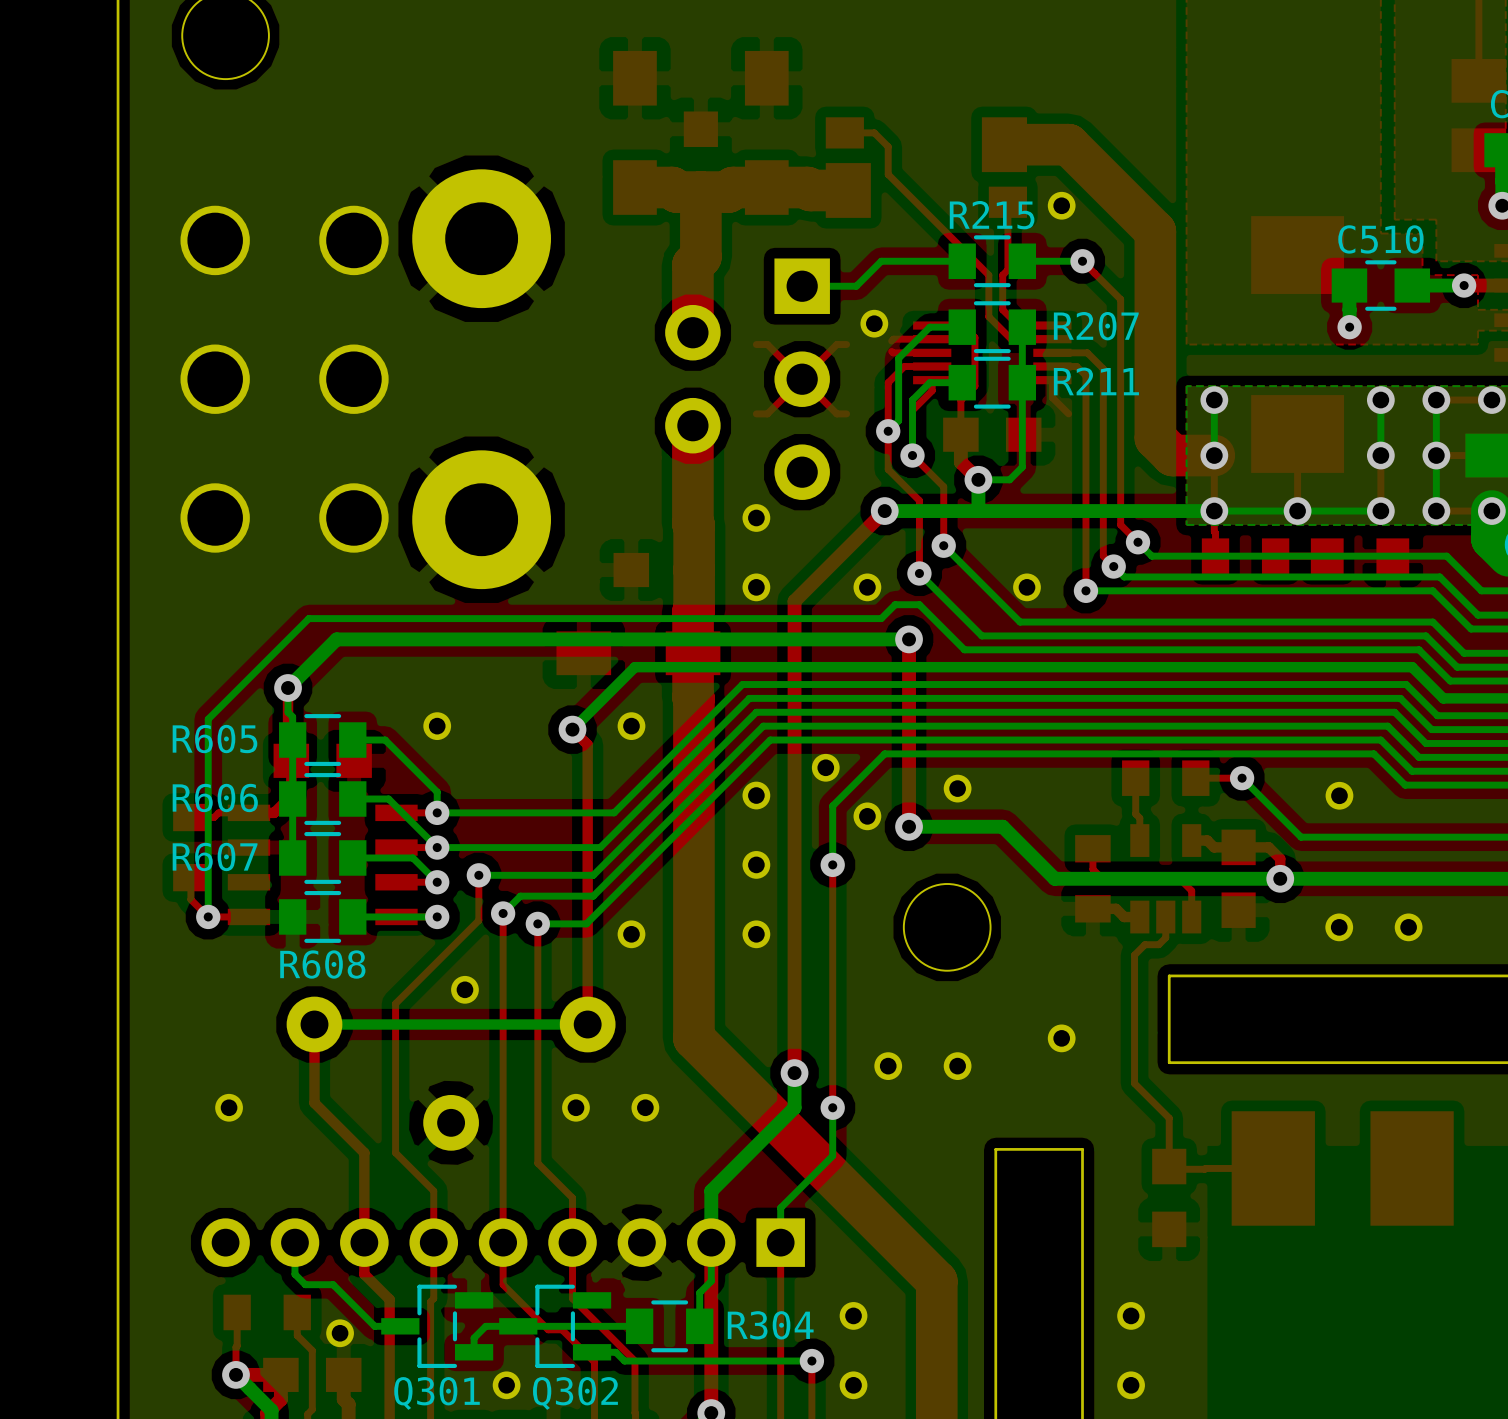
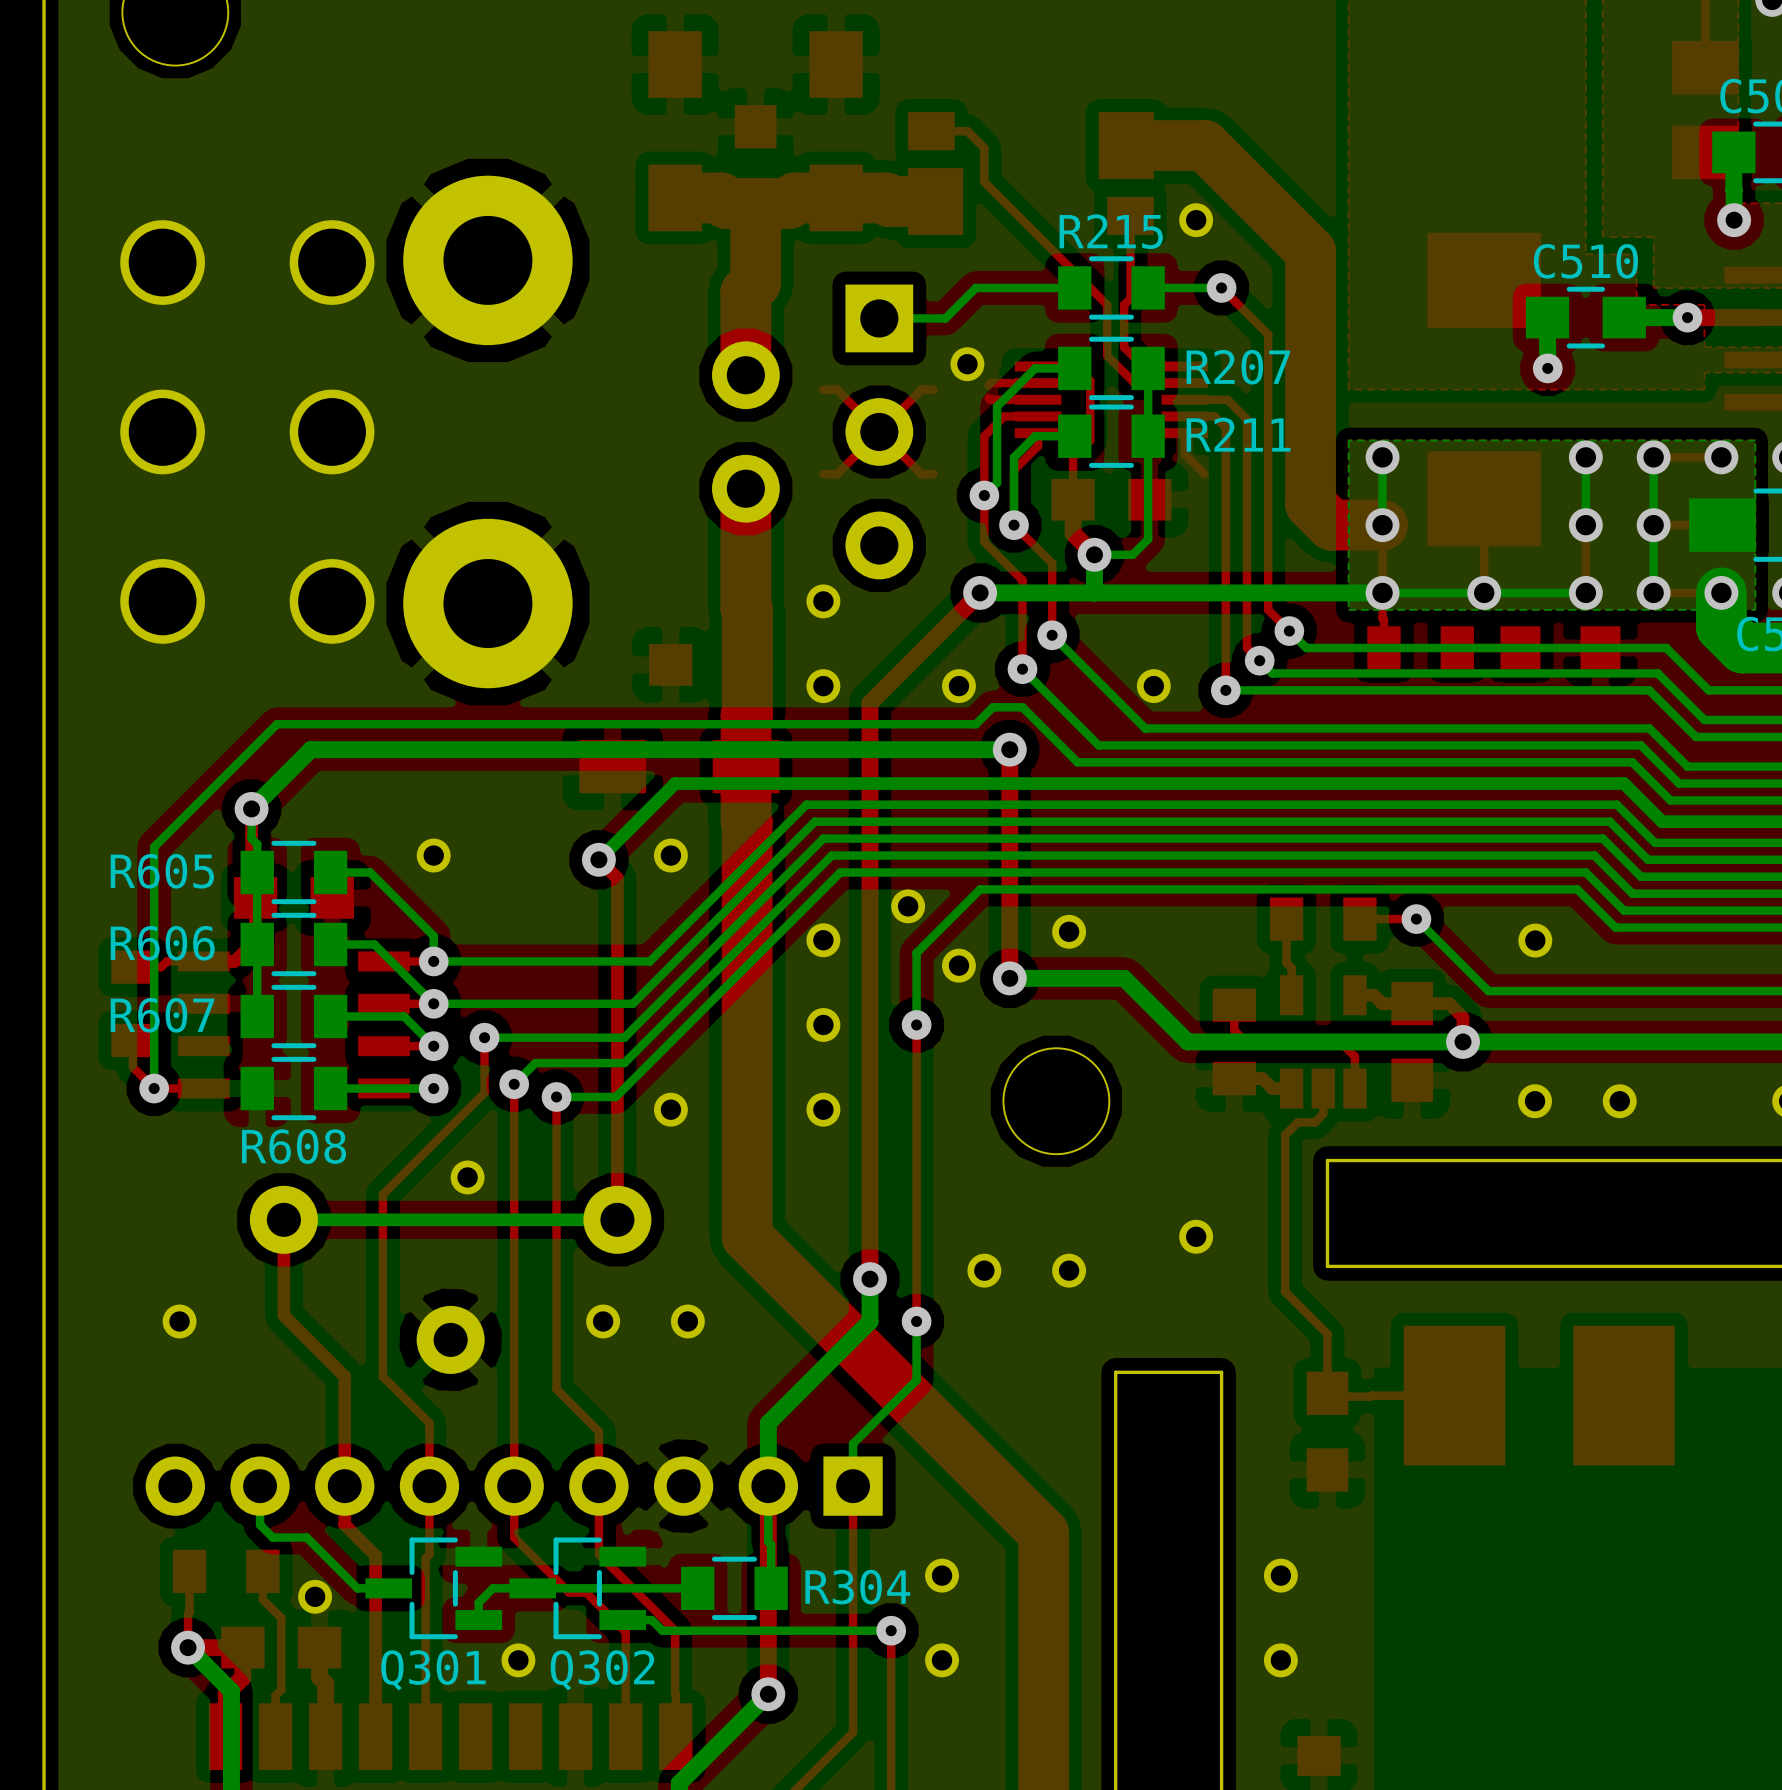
bottom track: (711, 1281) (699, 1292) (699, 1326) -> (768, 1533) (768, 1541) (771, 1544) (771, 1588)
R304 position: (669, 1326) -> (734, 1588)

